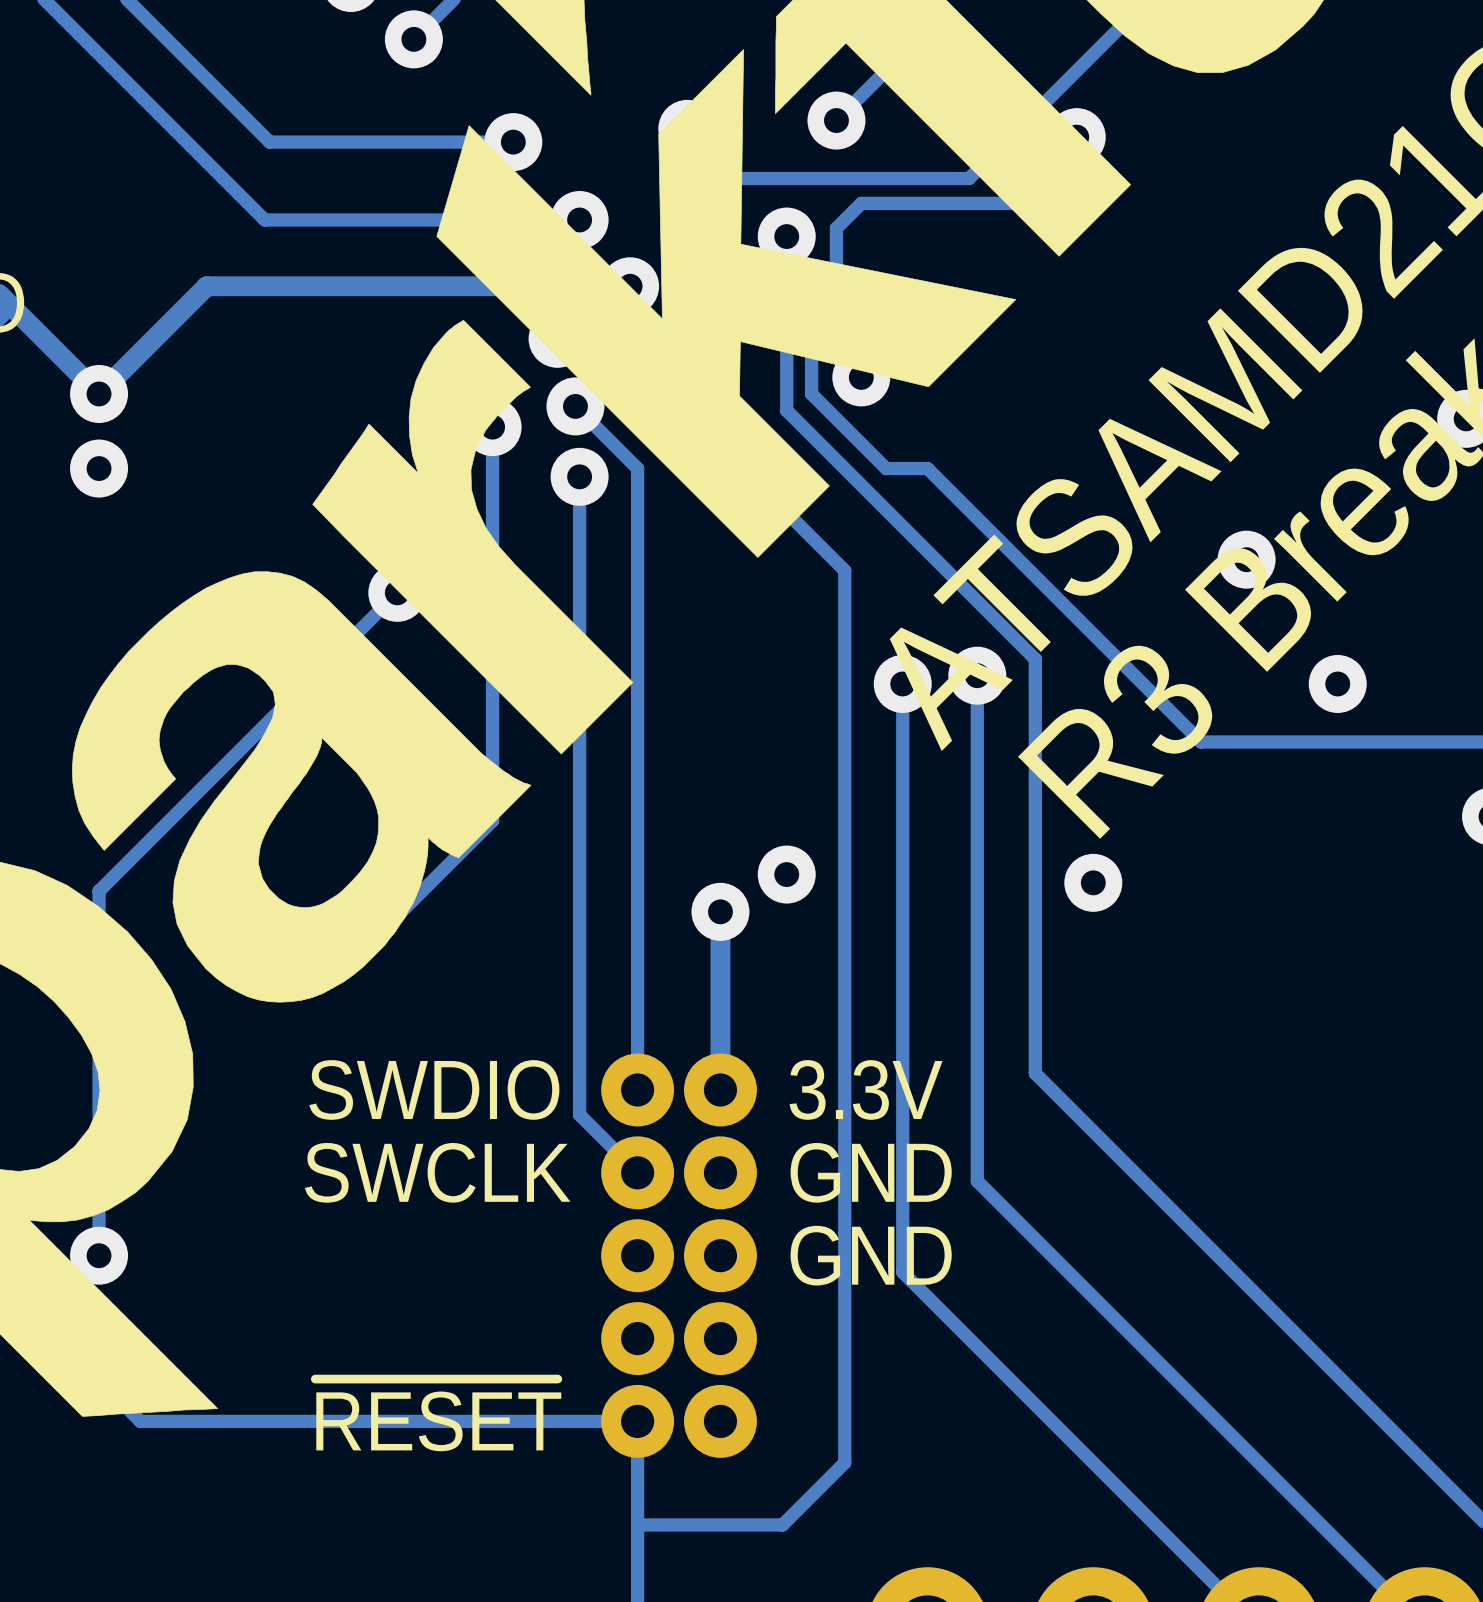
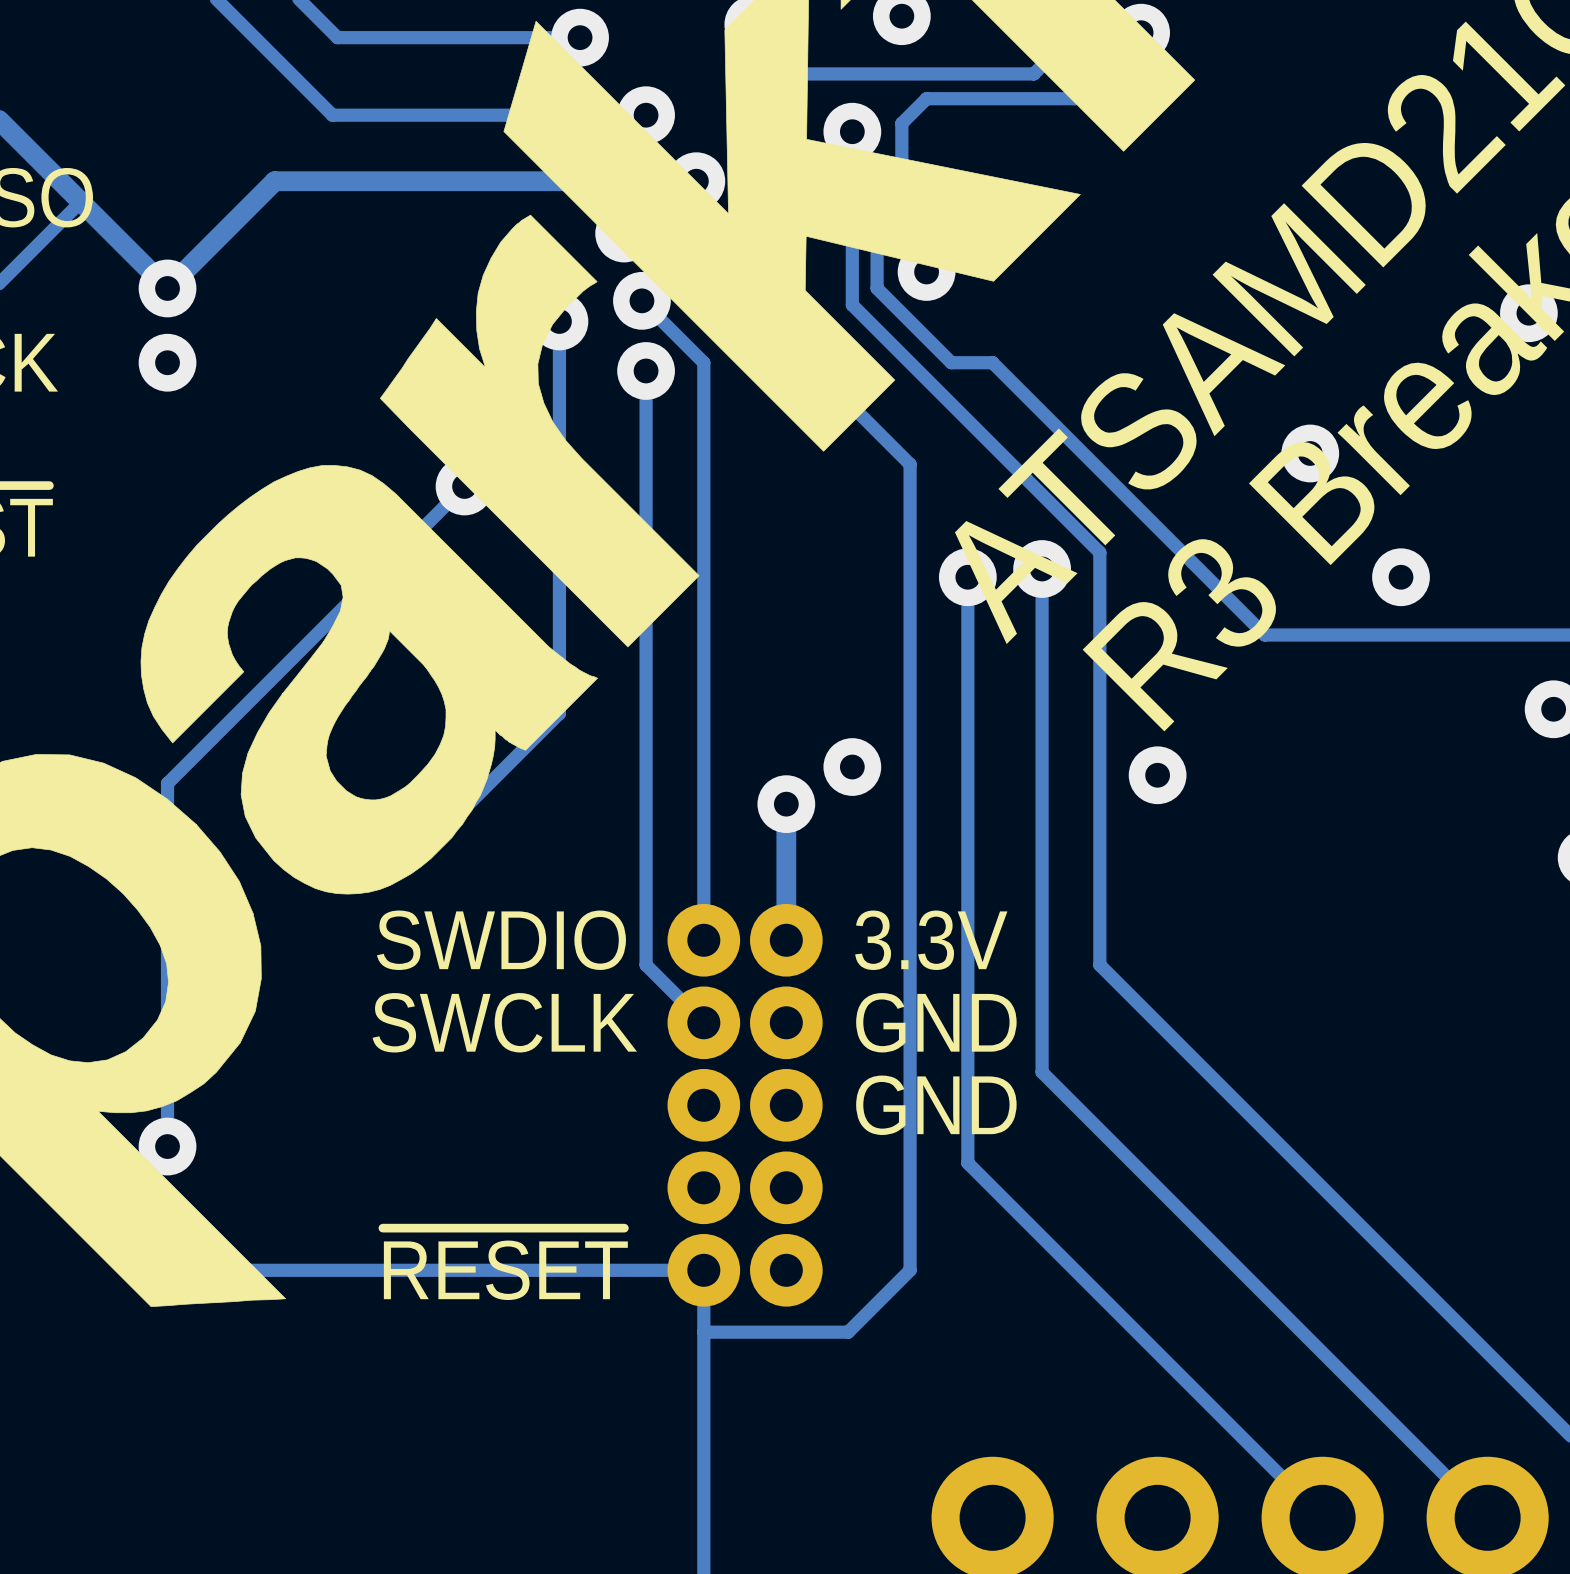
track: (579, 1073) (579, 1114) (637, 1172) -> (646, 965) (703, 1022)
text position: SWDIO (434, 1089) -> SWDIO (501, 940)
text position: 3.3V (866, 1089) -> 3.3V (931, 940)
text: none -> GND (936, 1022)
text position: SWCLK (437, 1172) -> SWCLK (504, 1022)
text: GND (871, 1172) -> none
text: none -> GND (936, 1105)
part position: (679, 1255) -> (745, 1105)
text: GND (871, 1255) -> none
track: (99, 1379) (140, 1421) (637, 1421) -> (167, 1270) (703, 1270) (703, 1311)
track: (844, 1379) (844, 1462) (782, 1524) (637, 1524) -> (910, 1270) (848, 1332) (703, 1332)
text position: ~{RESET} (438, 1415) -> ~{RESET} (505, 1264)

